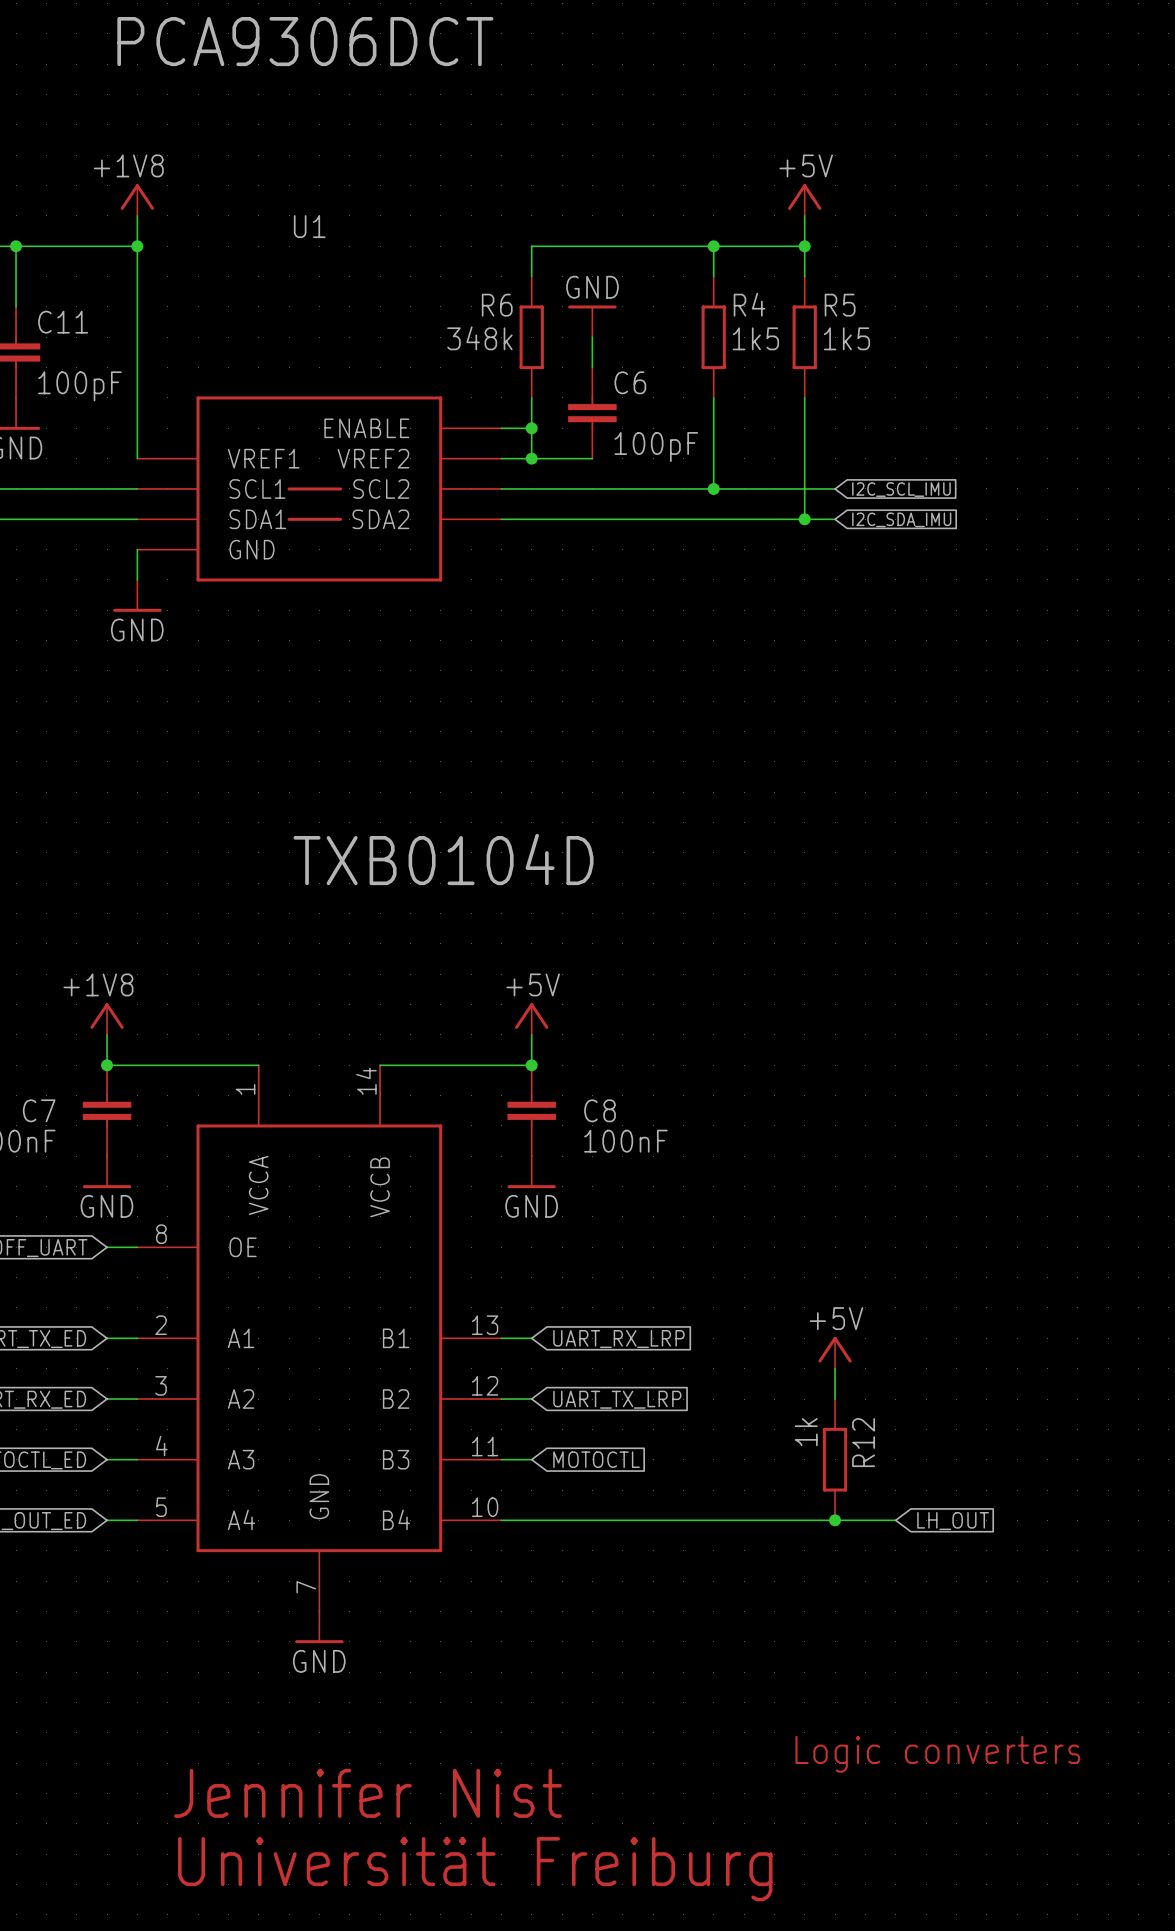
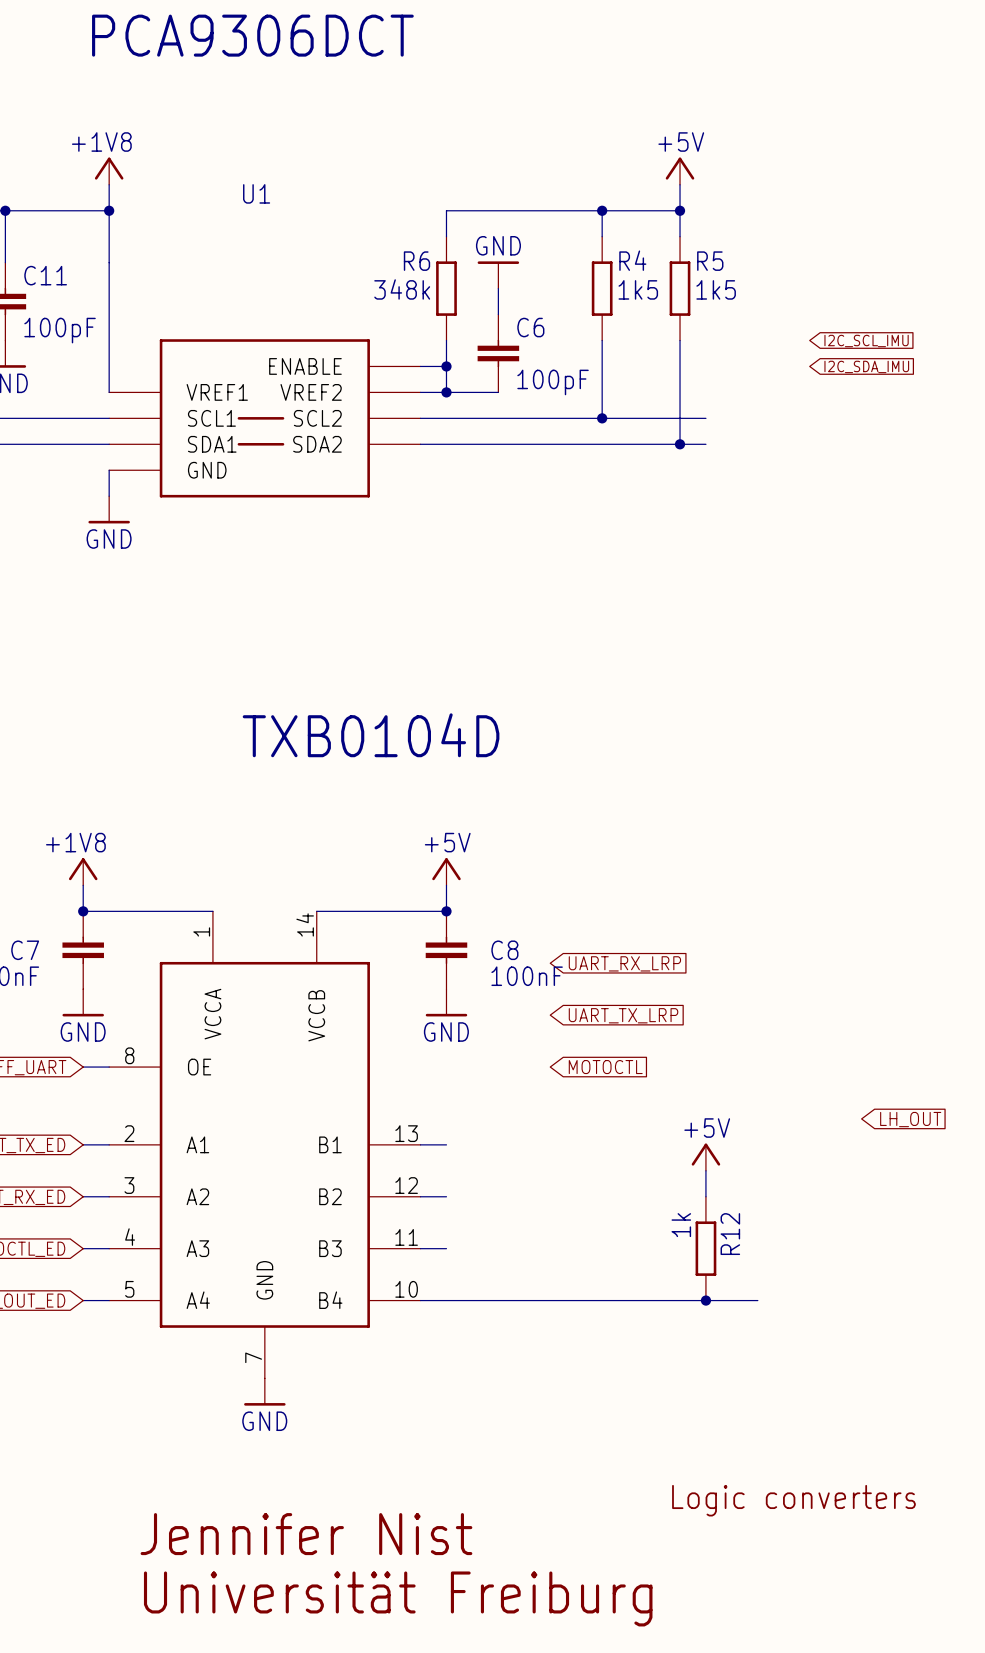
global label position: I2C_SCL_IMU (901, 489) -> I2C_SCL_IMU (866, 341)
global label position: I2C_SDA_IMU (901, 519) -> I2C_SDA_IMU (866, 366)
global label position: UART_RX_LRP (618, 1339) -> UART_RX_LRP (624, 963)
global label position: UART_TX_LRP (617, 1399) -> UART_TX_LRP (623, 1015)
global label position: MOTOCTL (596, 1459) -> MOTOCTL (605, 1067)
global label position: LH_OUT (953, 1521) -> LH_OUT (910, 1119)

